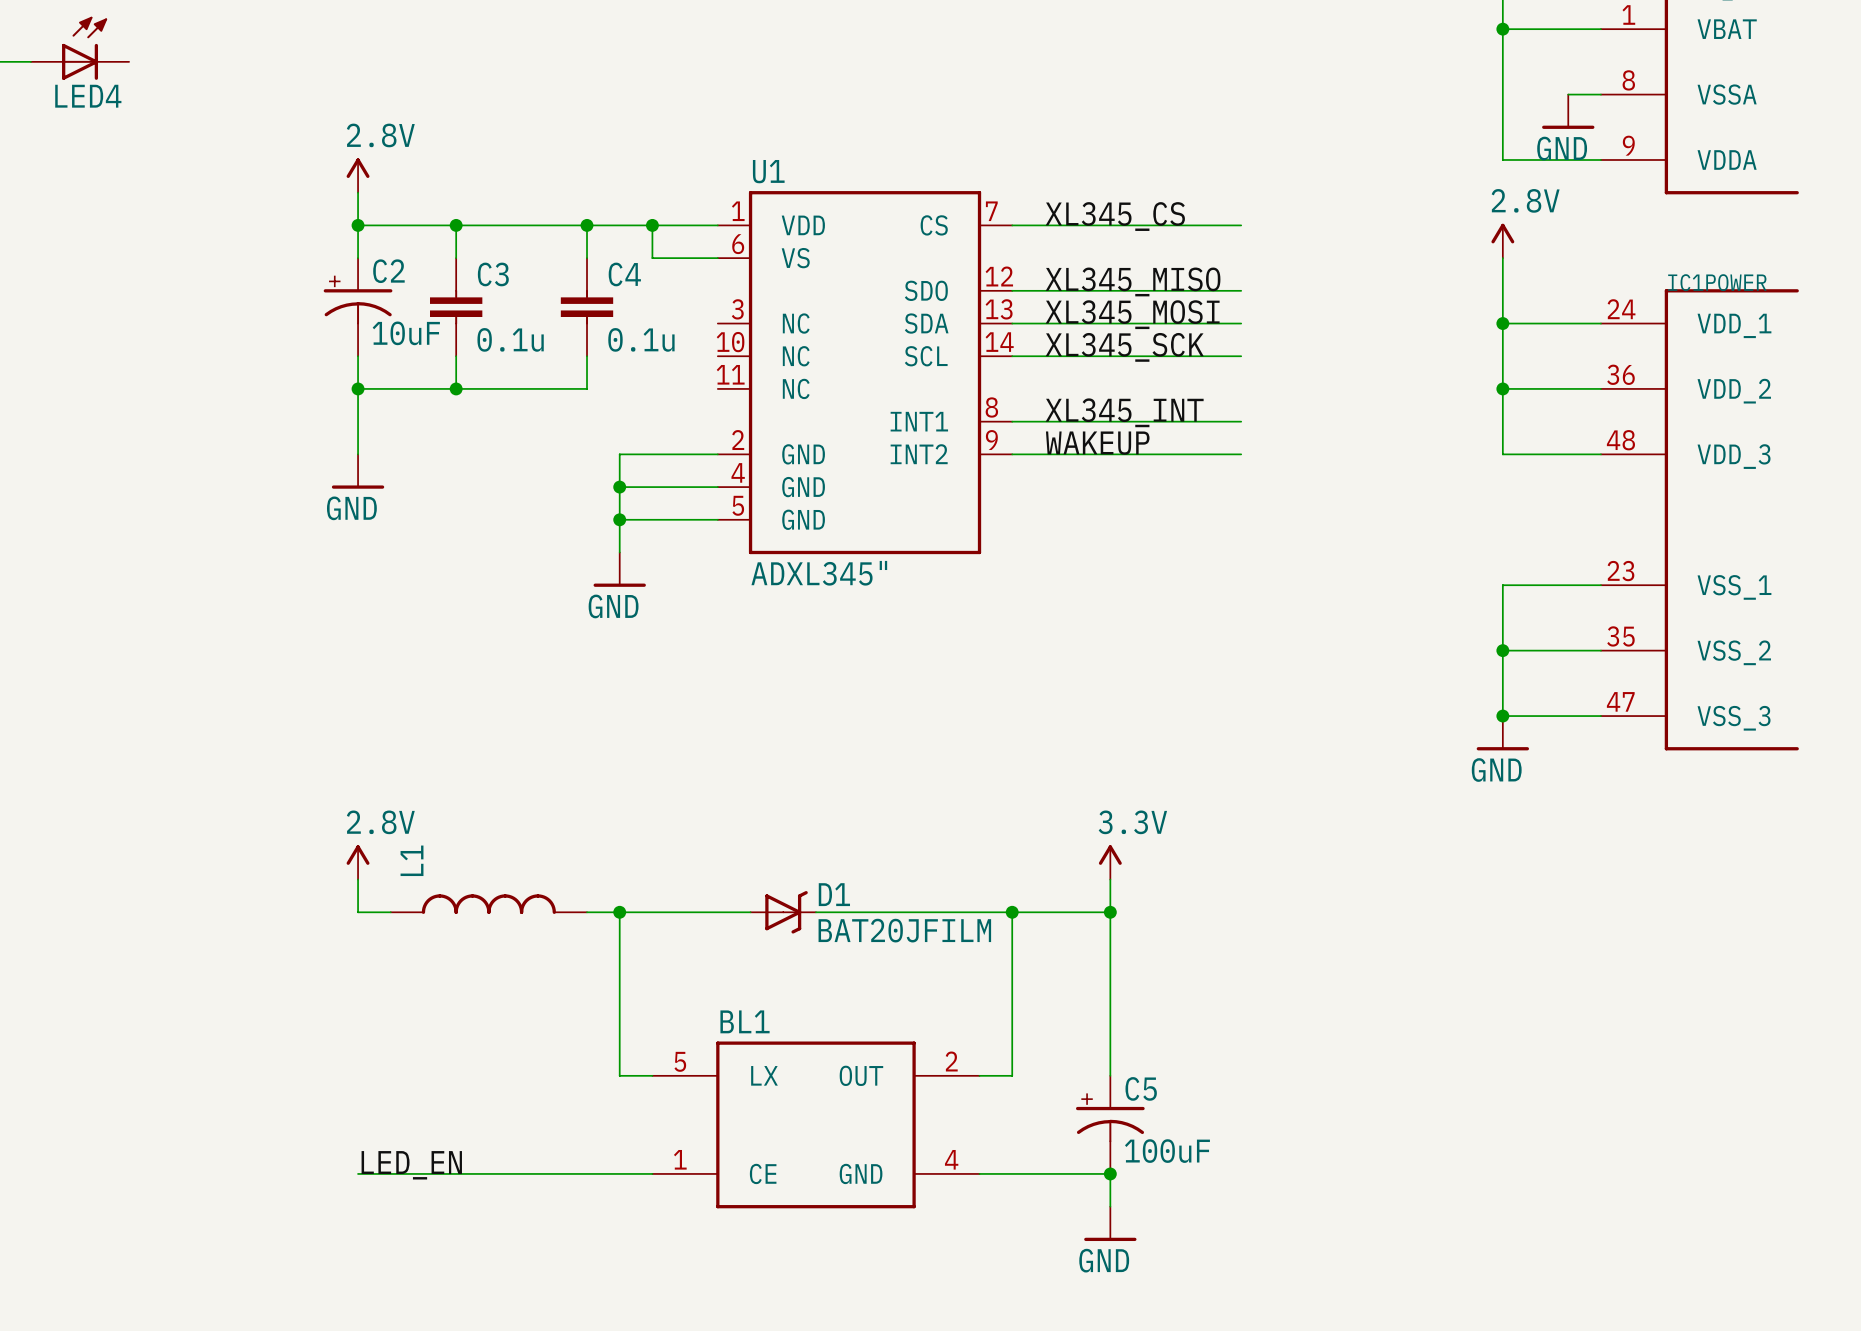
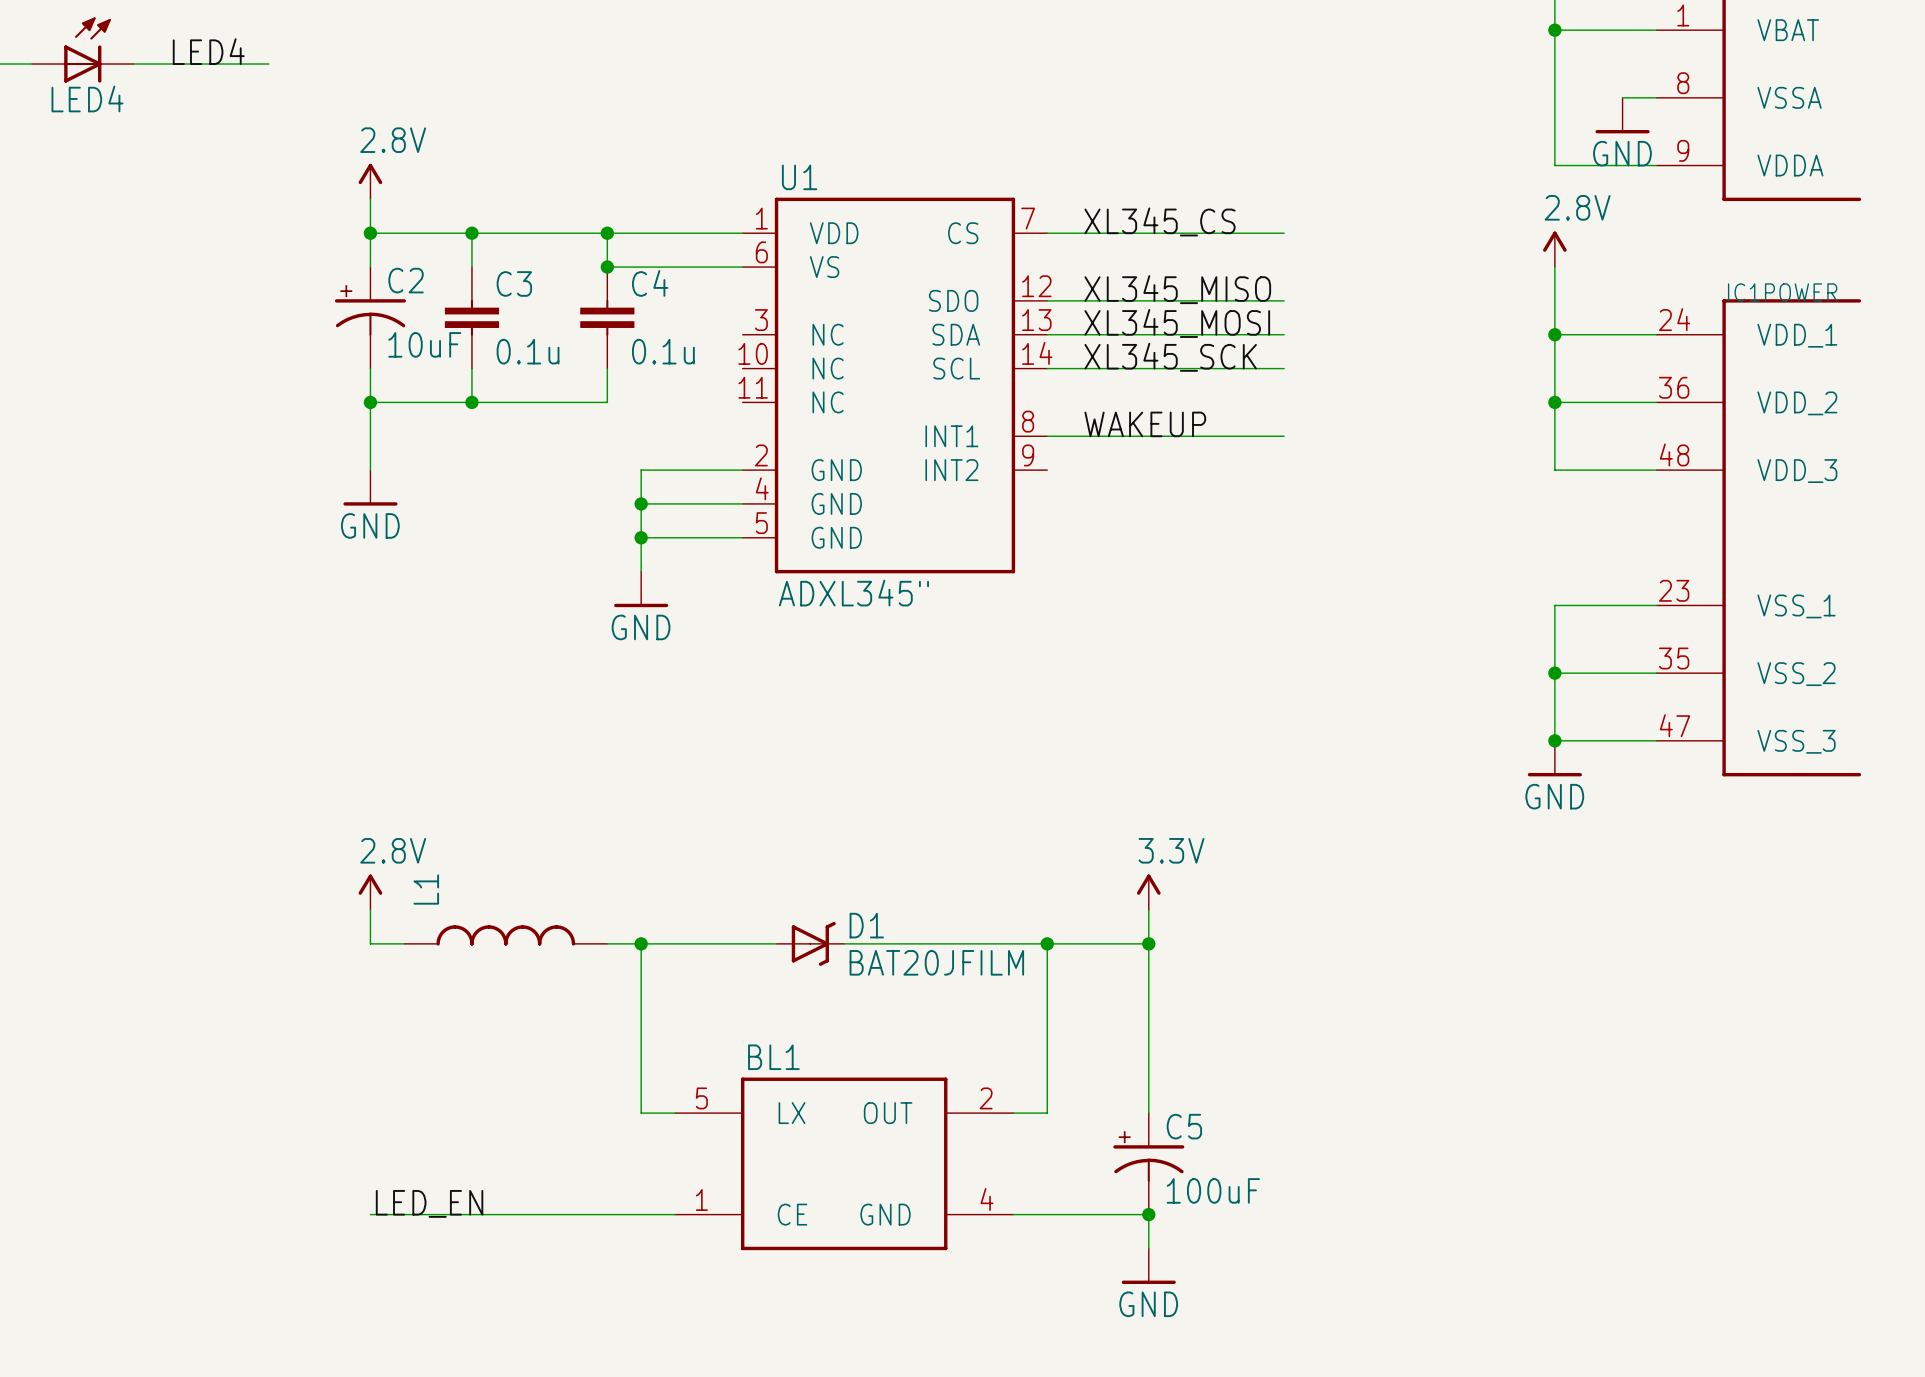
label: none -> LED4 (208, 51)
wire: none -> (133, 64) (268, 64)
wire: (652, 225) (652, 258) -> (607, 267) (675, 267)
junction position: (652, 225) -> (607, 267)
label: XL345_INT (1124, 412) -> WAKEUP (1145, 424)
label: WAKEUP (1097, 443) -> none
wire: (1012, 454) (1241, 454) -> none

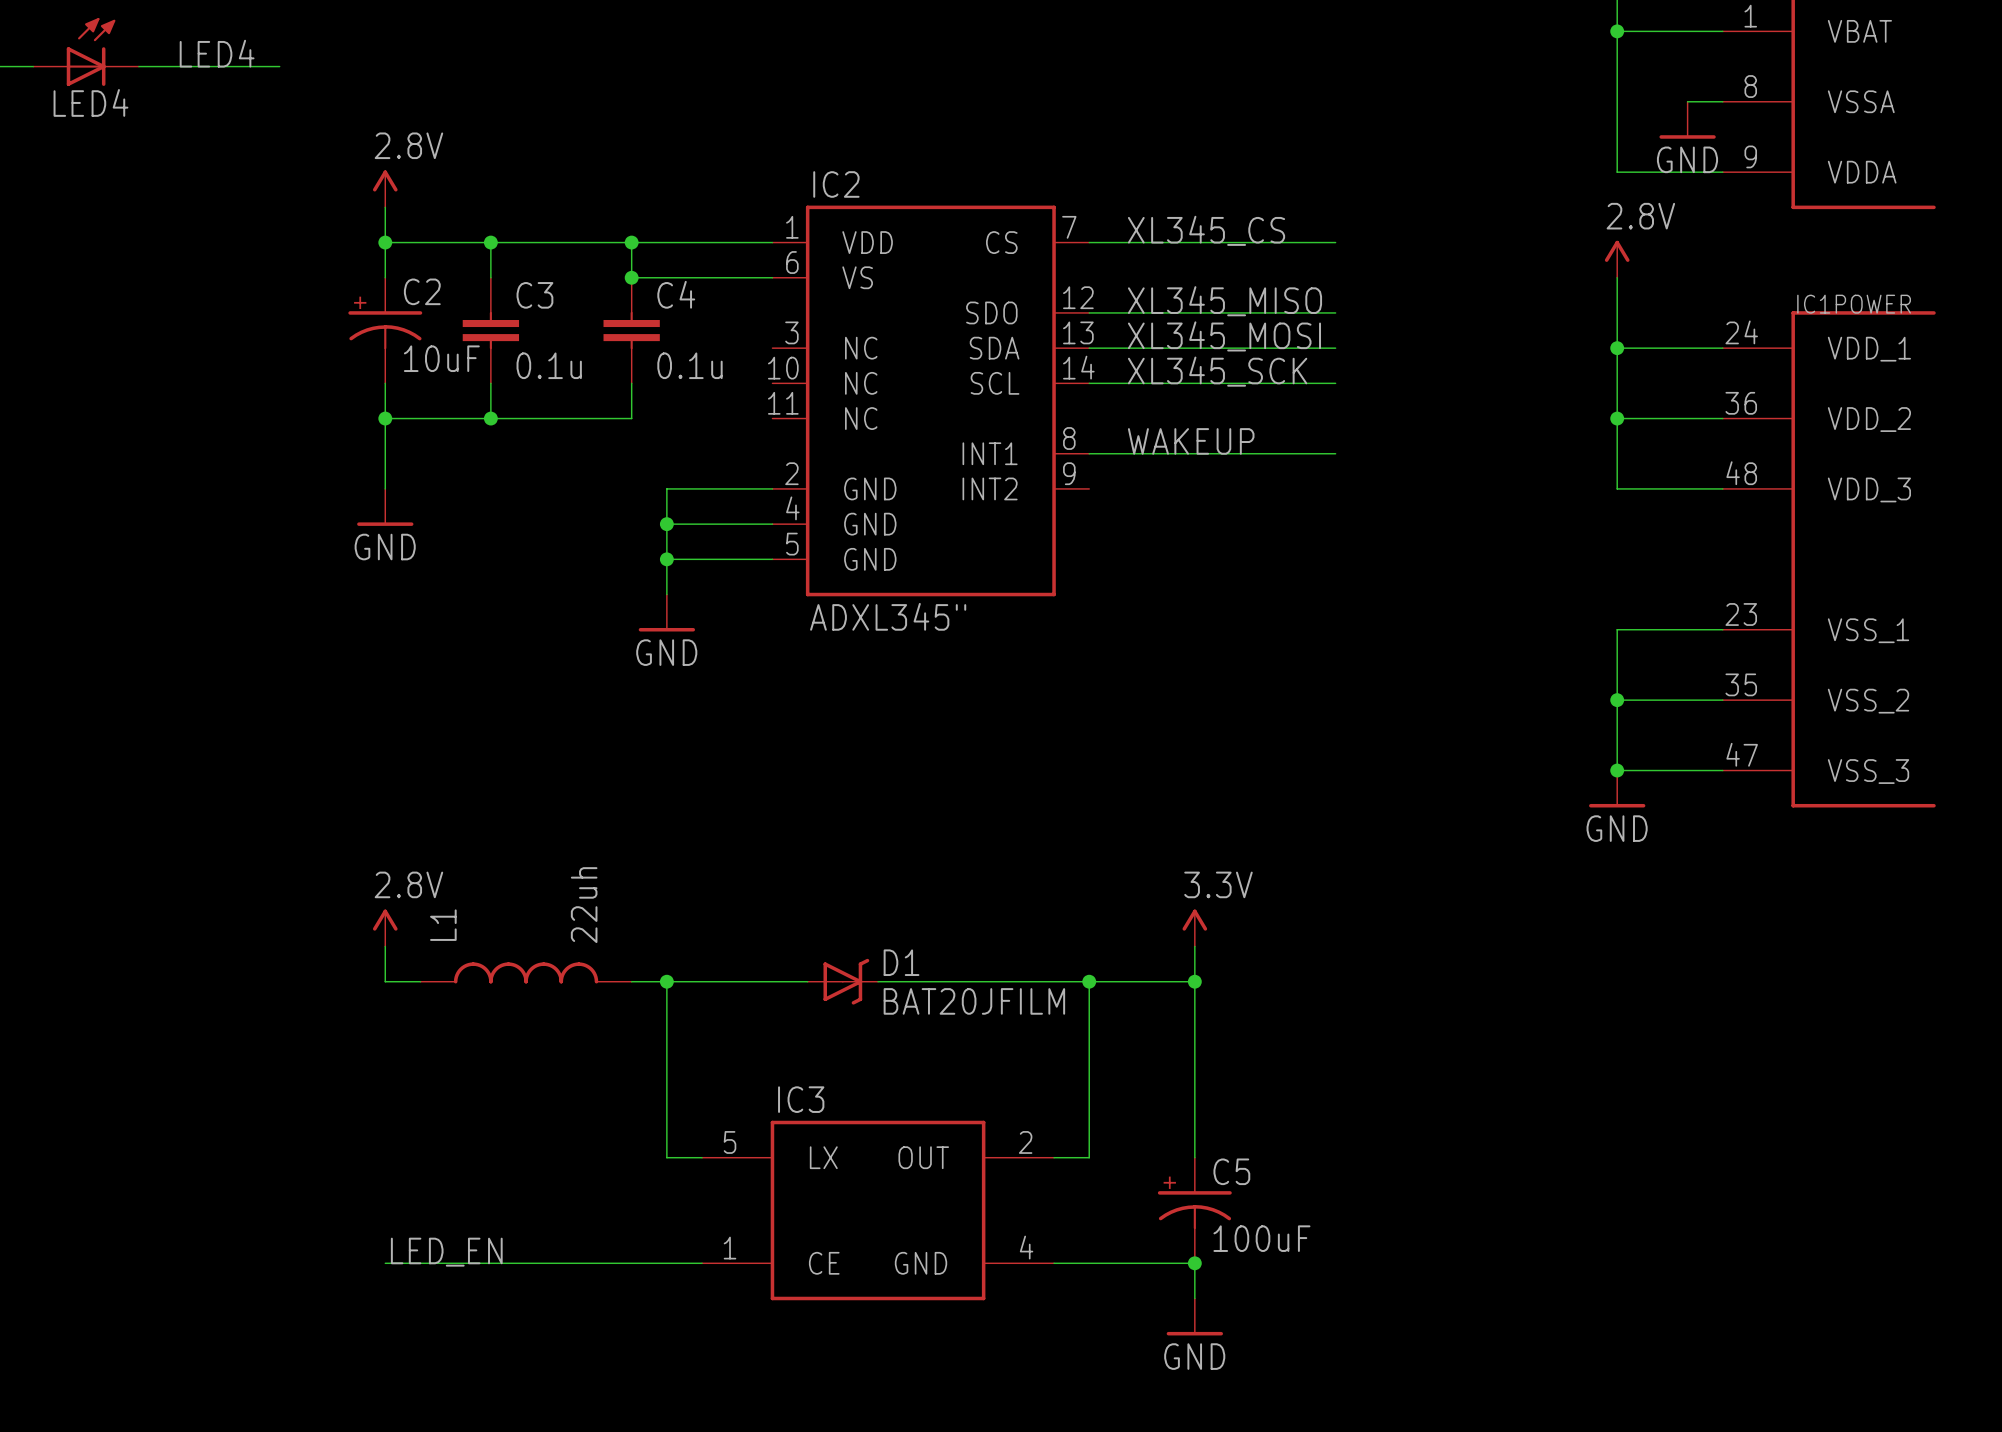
U1 name: U1 (799, 177) -> IC2 (836, 184)
L1 value: none -> 22uh (584, 905)
BL1 name: BL1 (773, 1057) -> IC3 (801, 1099)

